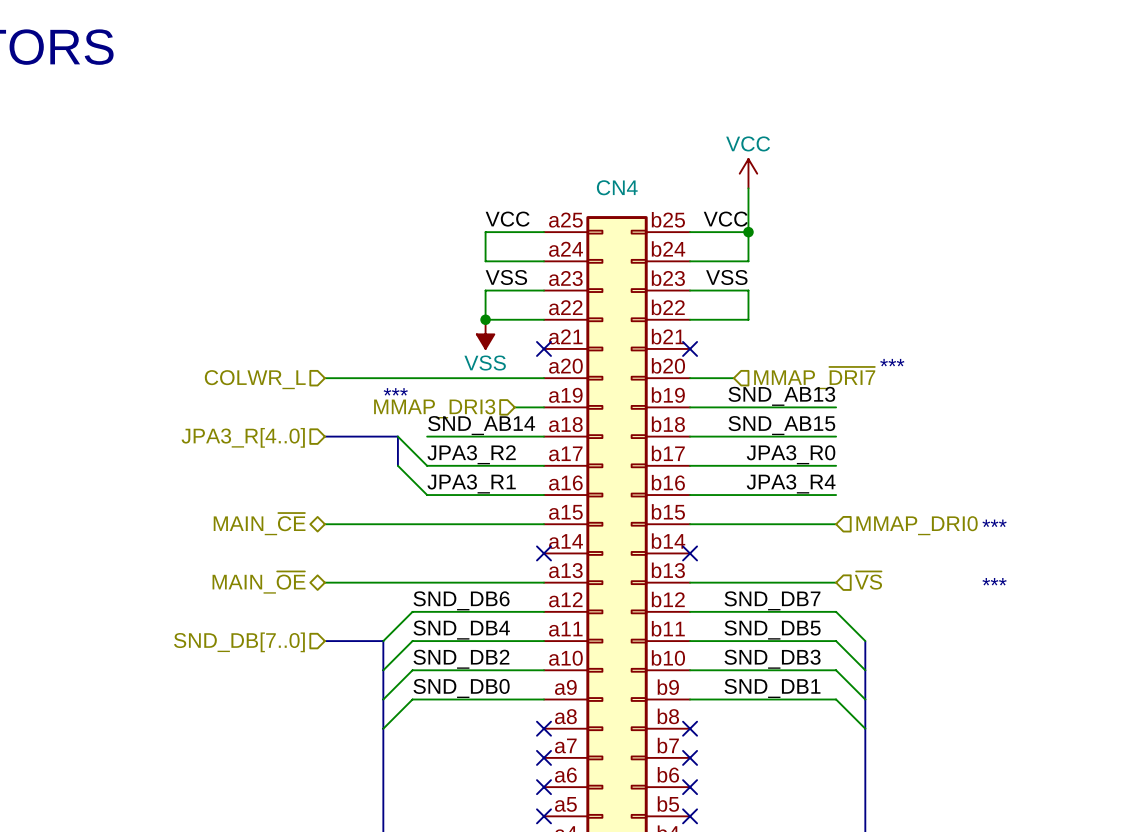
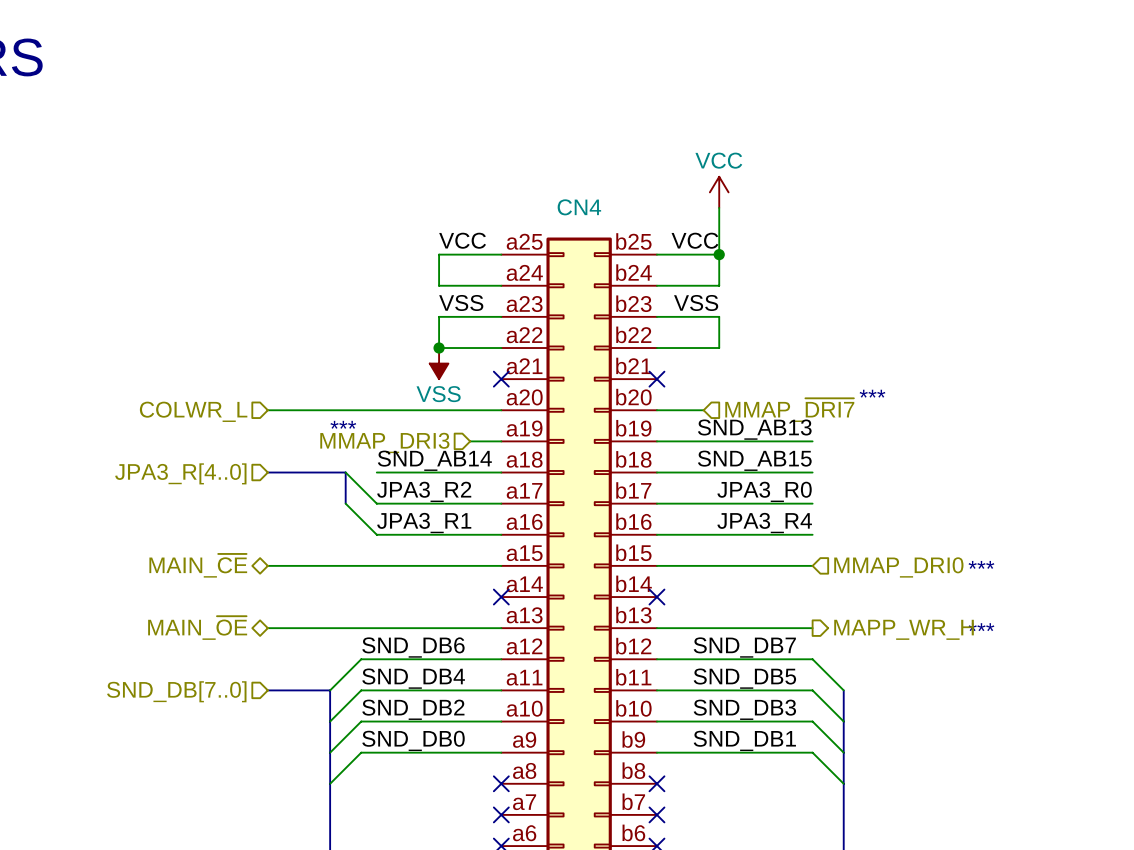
hierarchical label shape: input (868, 580) -> output (904, 629)
hierarchical label: ~{VS} (868, 580) -> MAPP_WR_H (904, 629)

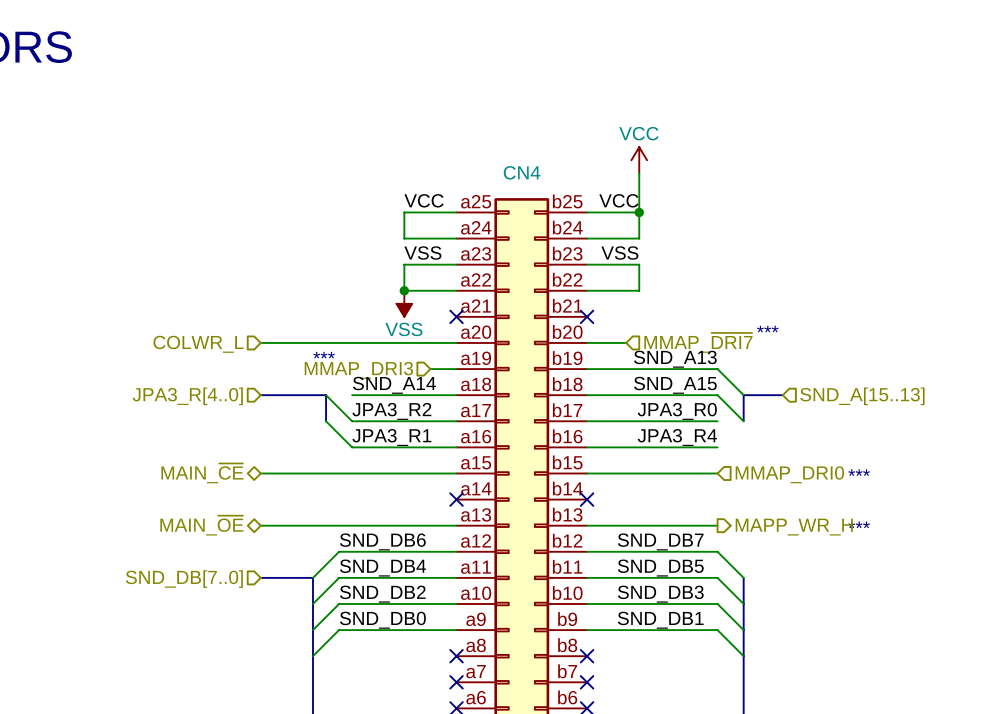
label: SND_AB13 (754, 429) -> SND_A13 (675, 359)
wire: none -> (717, 369) (743, 395)
label: SND_AB14 (434, 460) -> SND_A14 (394, 385)
label: SND_AB15 (754, 460) -> SND_A15 (675, 385)
wire: none -> (717, 395) (743, 421)
bus: none -> (782, 395) (743, 395) (743, 421)
hierarchical label: none -> SND_A[15..13] (862, 396)

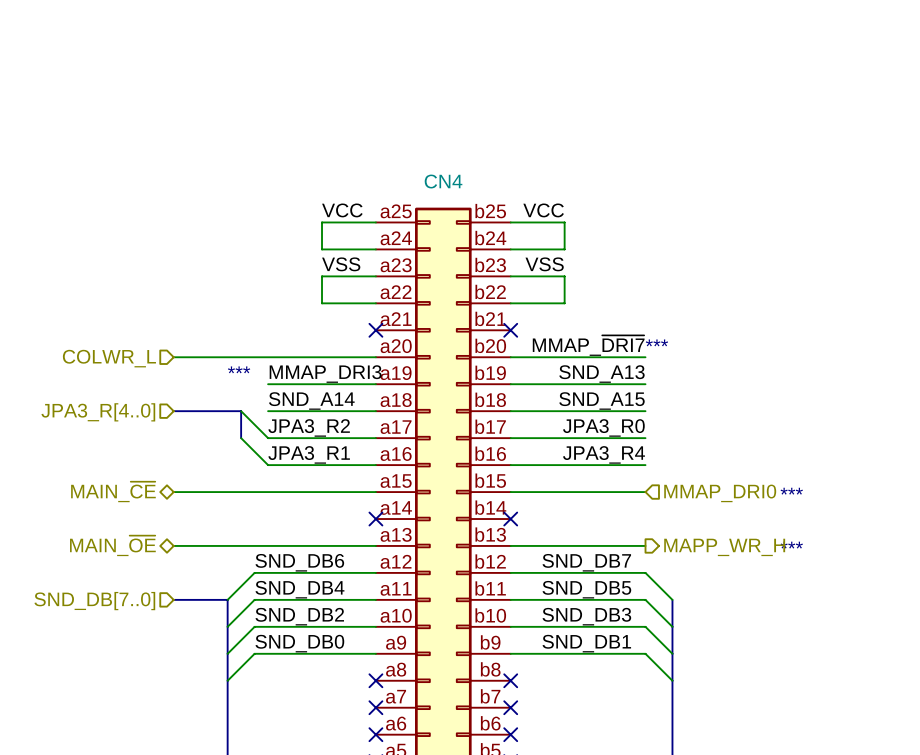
power symbol: VCC (639, 160) -> none
wire: (639, 173) (639, 212) -> none
junction: (639, 212) -> none
junction: (404, 290) -> none
power symbol: VSS (404, 303) -> none
text position: *** (767, 329) -> *** (656, 342)
label: none -> MMAP_~{DRI7} (588, 345)
wire: none -> (551, 357) (645, 357)
hierarchical label: MMAP_~{DRI7} (698, 342) -> none
label: none -> MMAP_DRI3 (325, 374)
wire: none -> (268, 384) (348, 384)
wire: (717, 369) (743, 395) -> none
hierarchical label: MMAP_DRI3 (358, 370) -> none
wire: (717, 395) (743, 421) -> none
bus: (782, 395) (743, 395) (743, 421) -> none
hierarchical label: SND_A[15..13] (862, 396) -> none

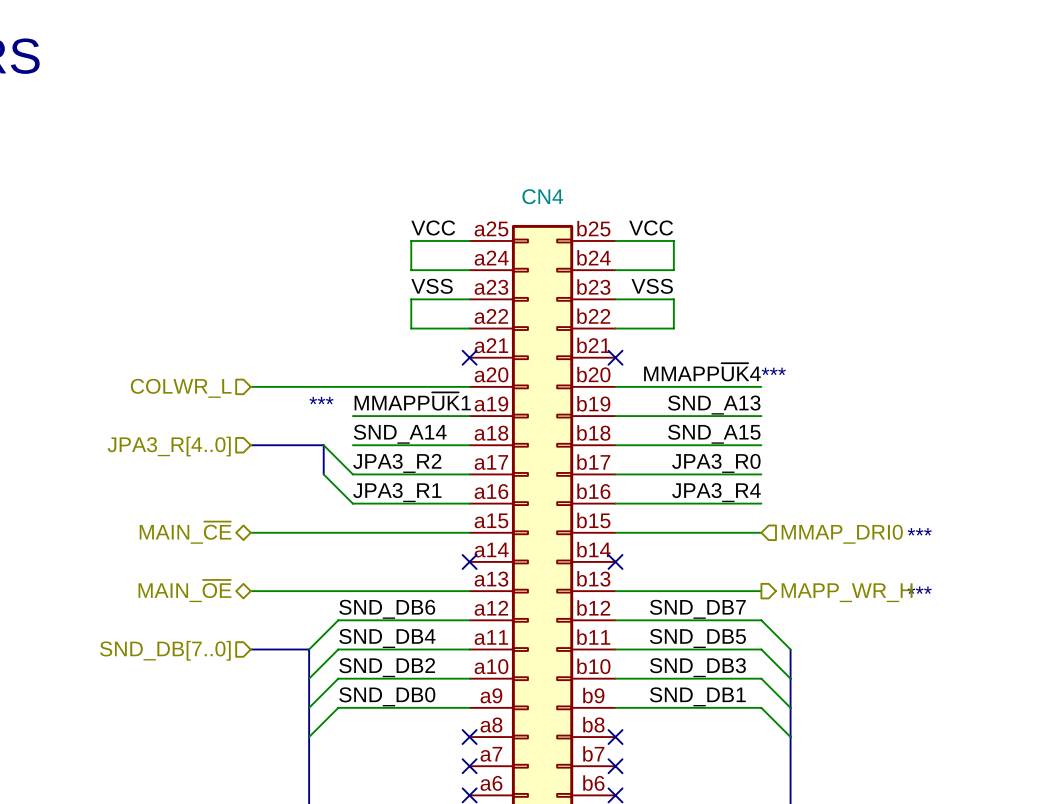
label: MMAP_~{DRI7} (588, 345) -> MMAPP~{UK}4 (702, 372)
label: MMAP_DRI3 (325, 374) -> MMAPP~{UK}1 (412, 401)

